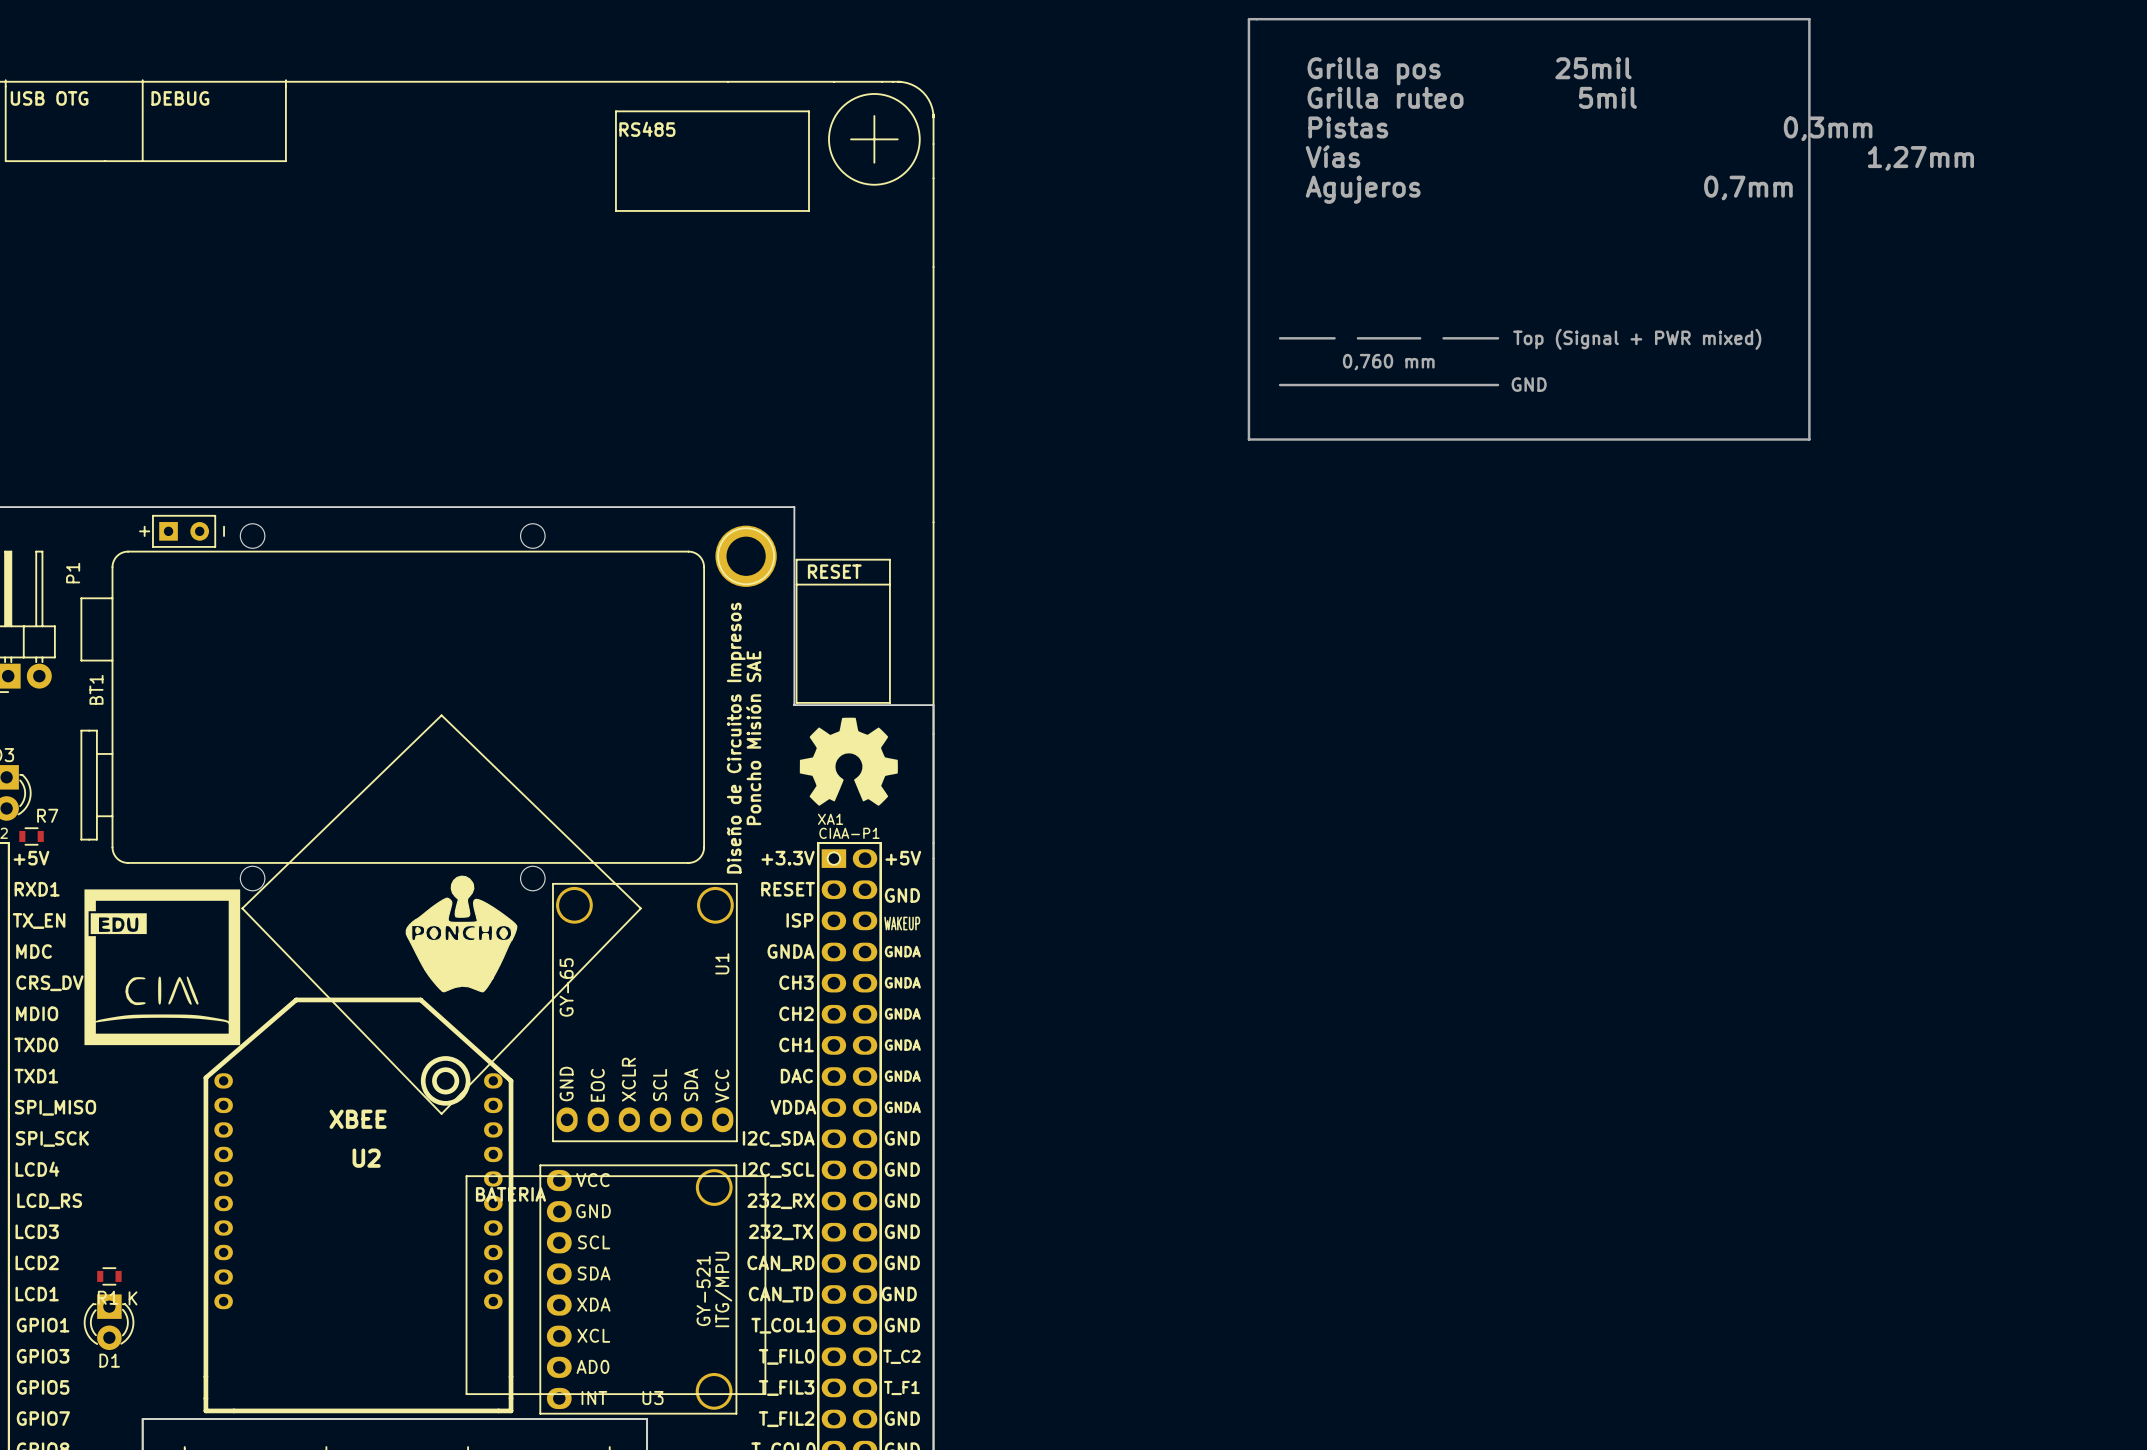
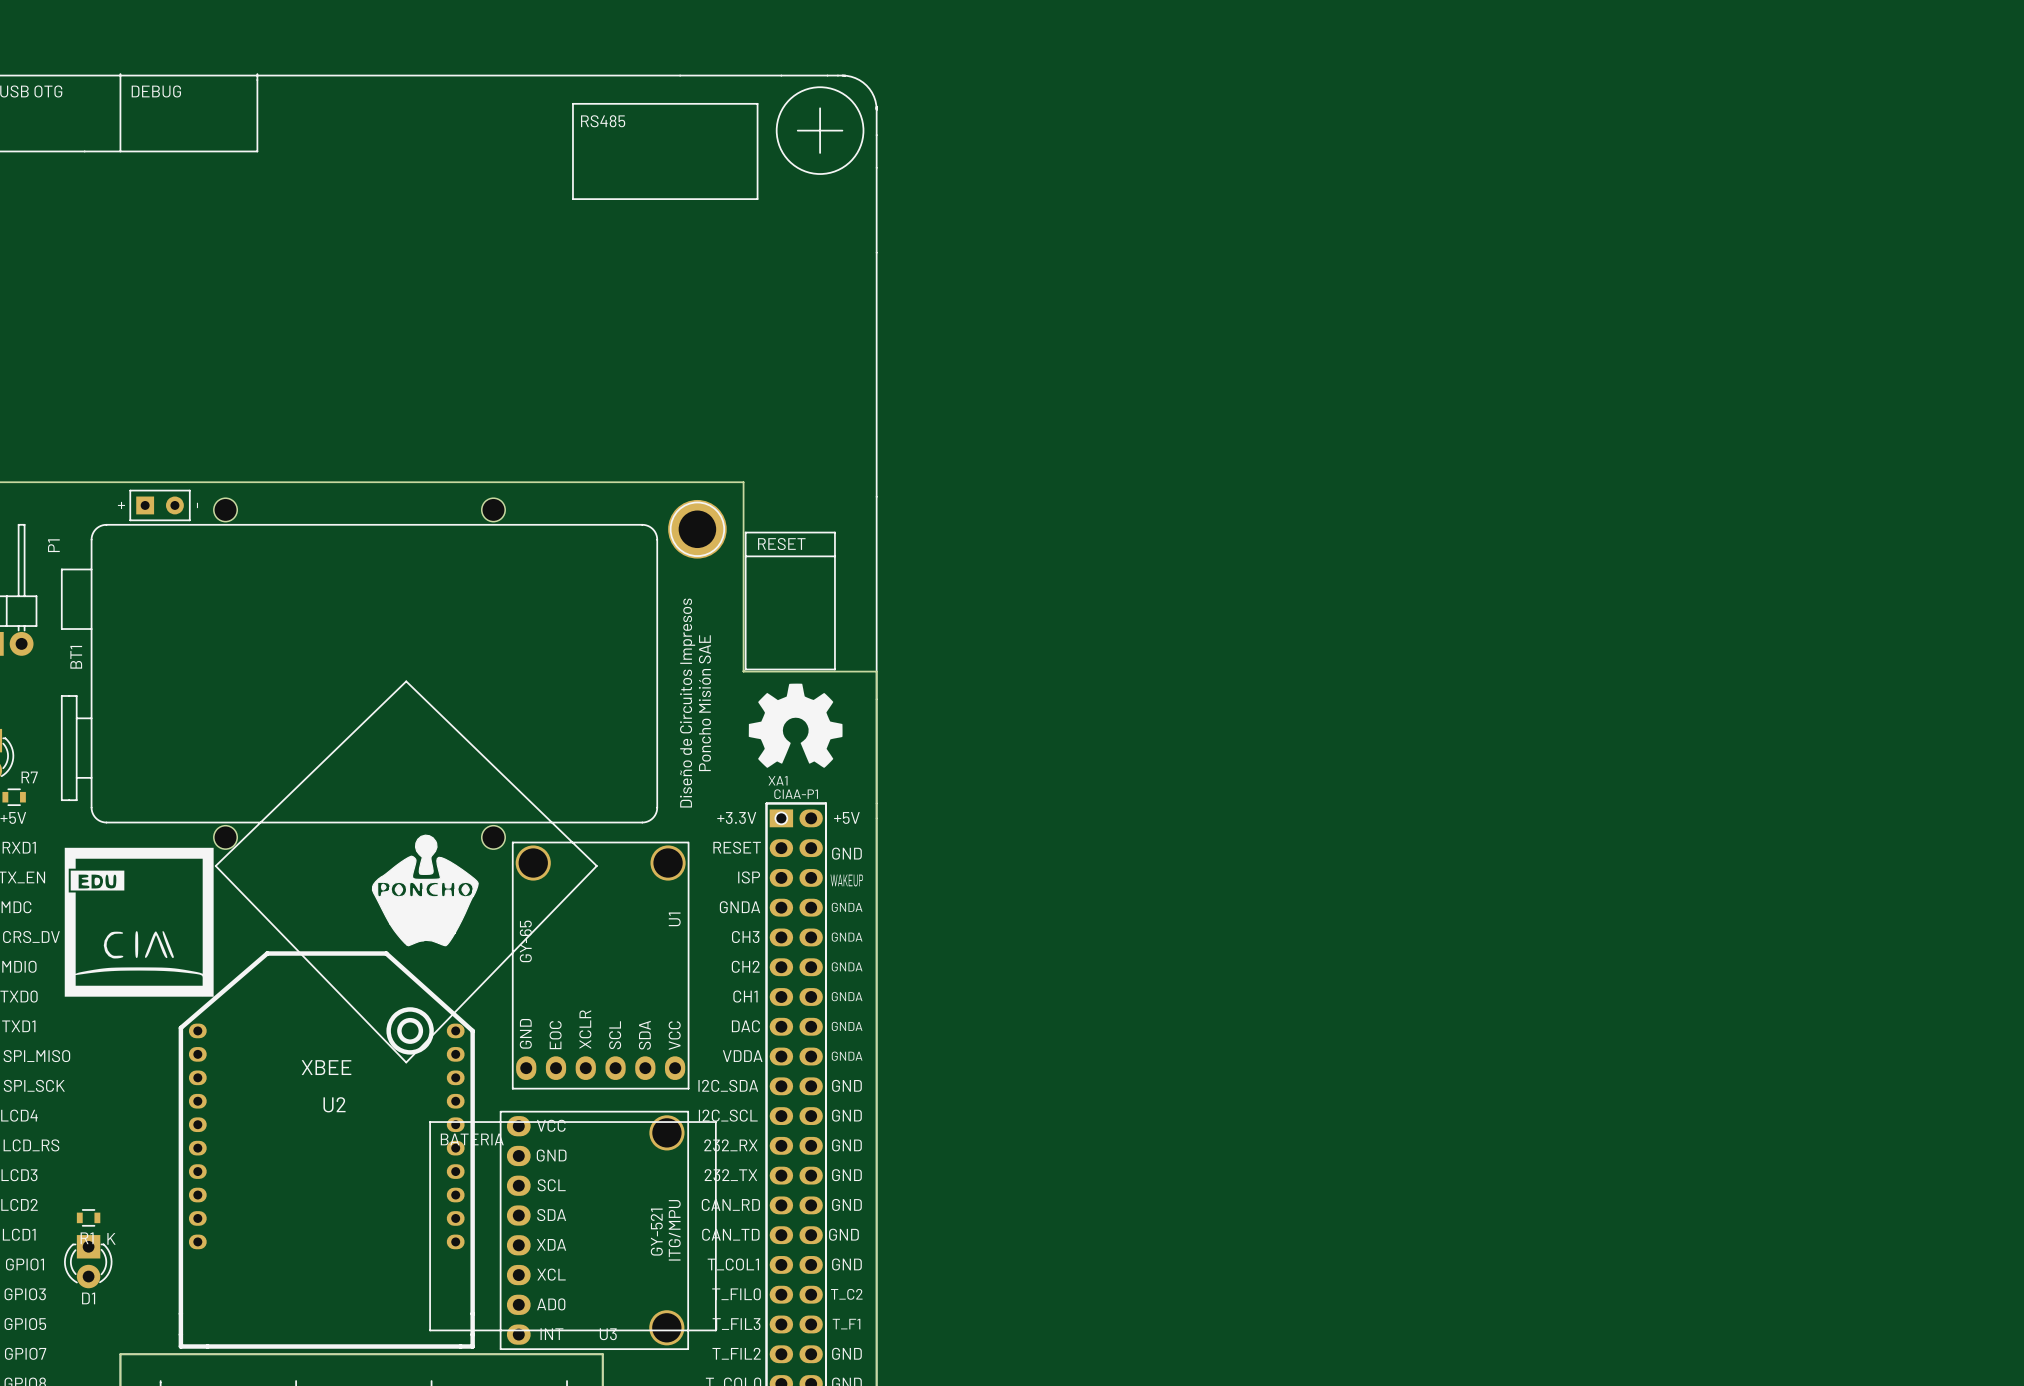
line: (1248, 19) (1809, 19) (1809, 439) (1248, 439) (1248, 19) -> none
text: Grilla pos 25mil (1469, 71) -> none
text: Grilla ruteo 5mil (1472, 97) -> none
text: Pistas 0,3mm (1590, 128) -> none
text: Vías 1,27mm (1639, 157) -> none
text: Agujeros 0,7mm (1549, 189) -> none
line: (1280, 338) (1334, 338) -> none
line: (1357, 338) (1420, 338) -> none
line: (1443, 338) (1498, 338) -> none
text: Top (Signal + PWR mixed) (1637, 339) -> none
text: 0,760 mm (1388, 362) -> none
text: GND (1529, 384) -> none
line: (1280, 385) (1498, 385) -> none

